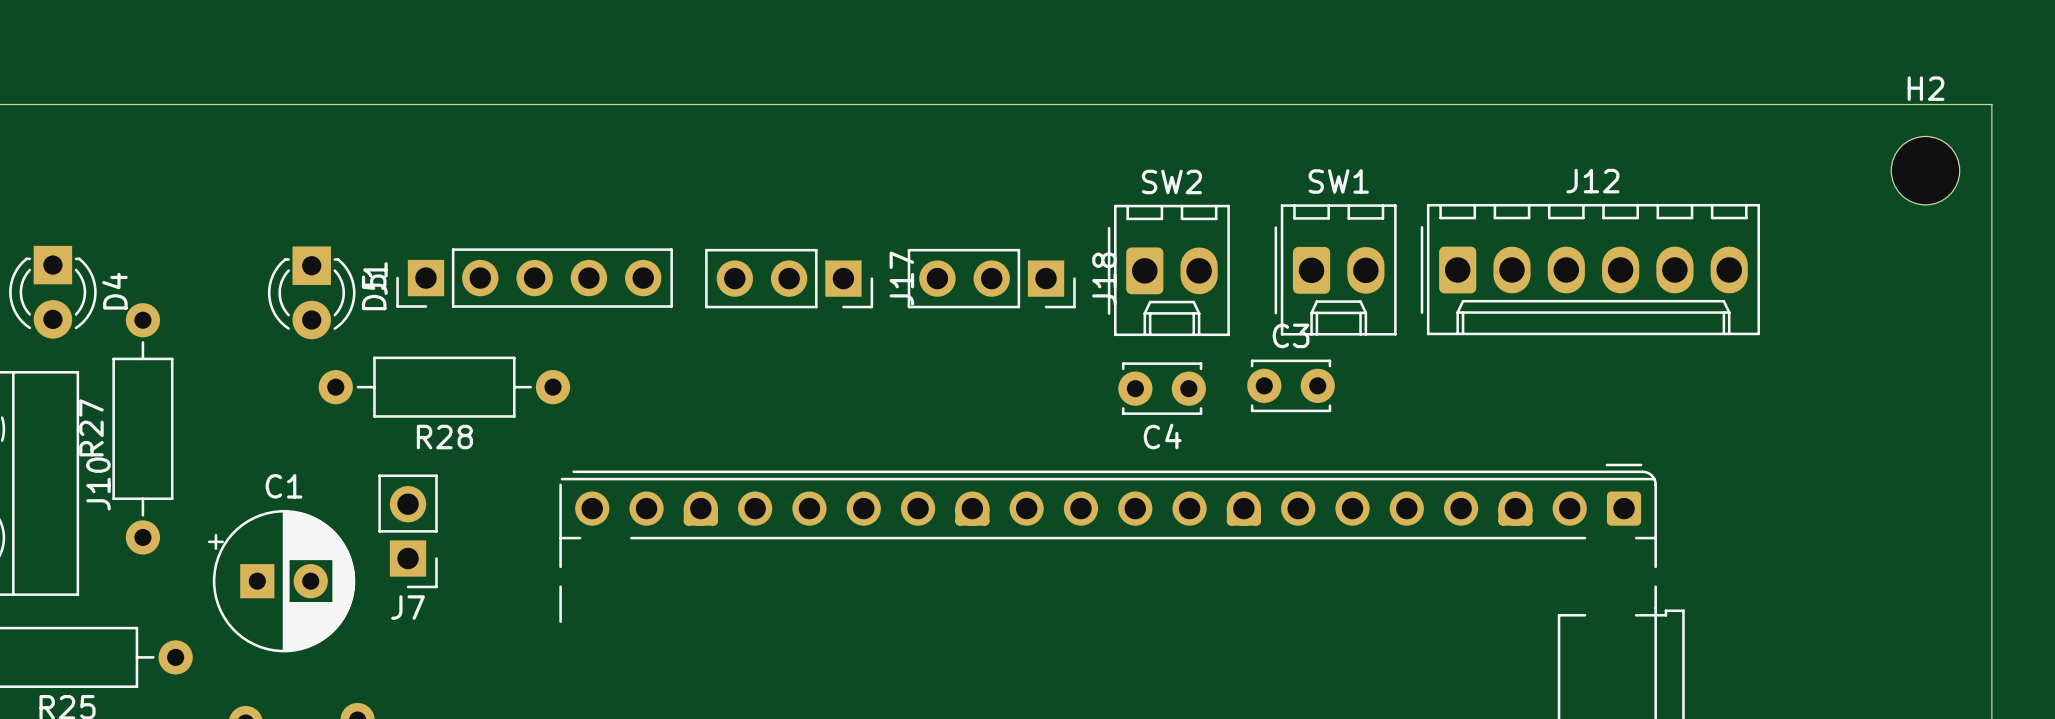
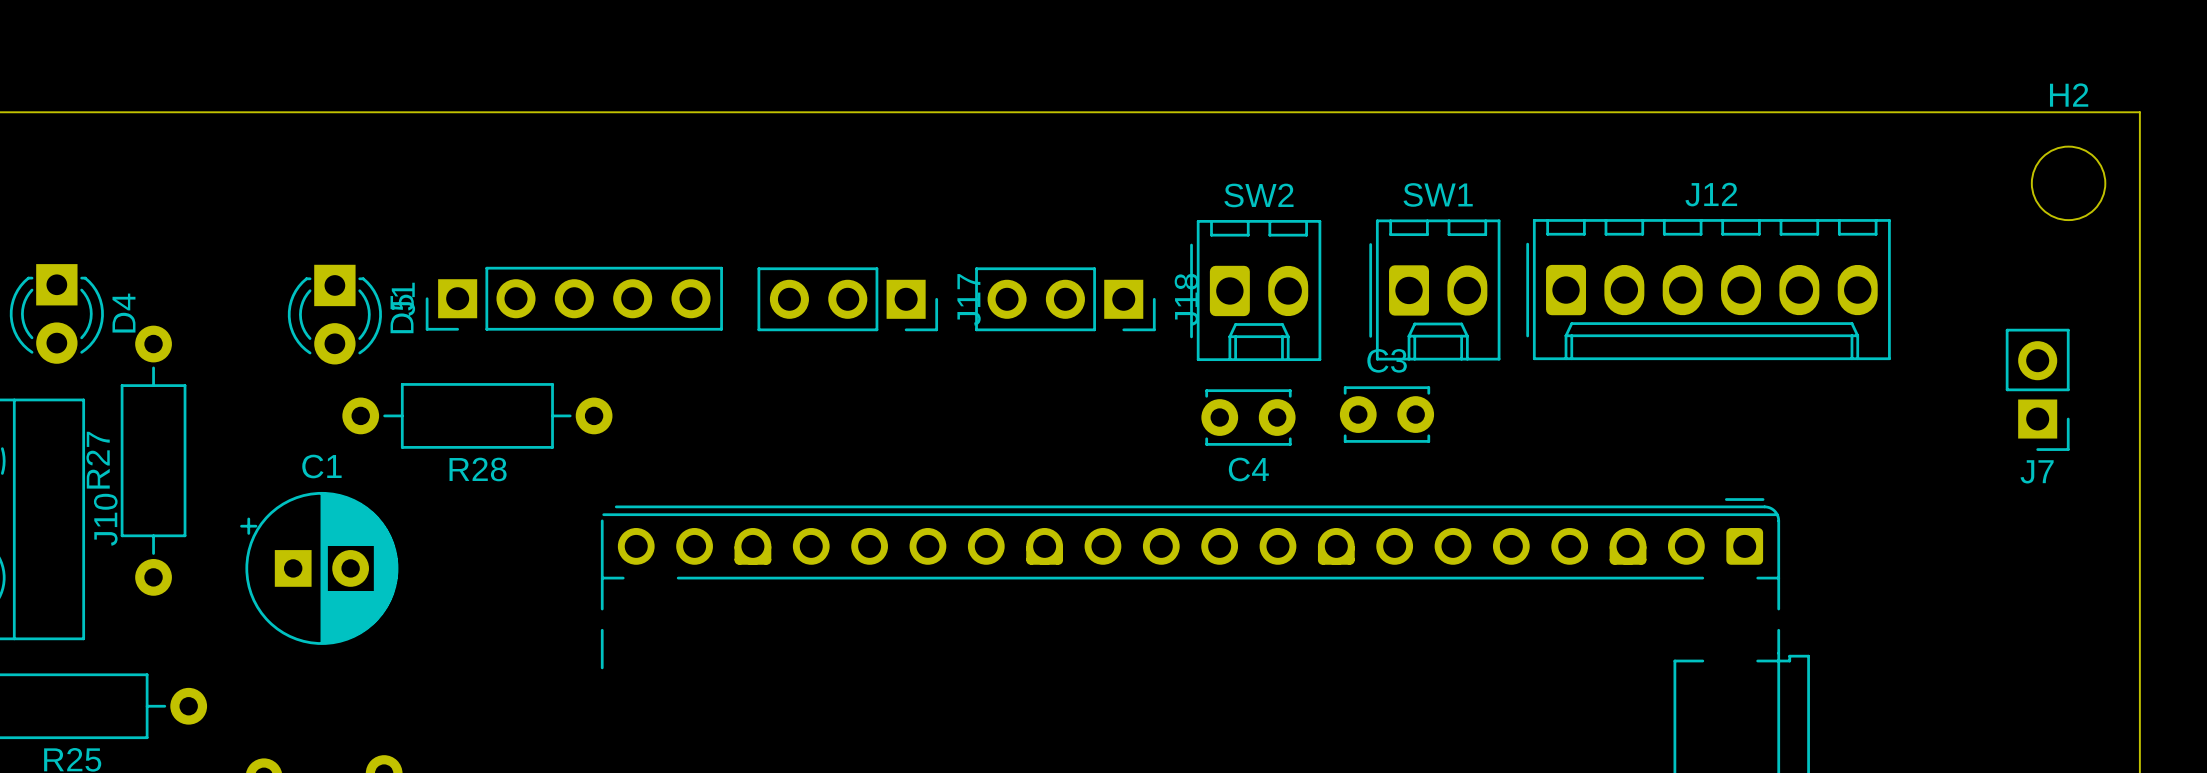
J7 position: (408, 531) -> (2037, 389)
C1 position: (281, 581) -> (319, 568)

